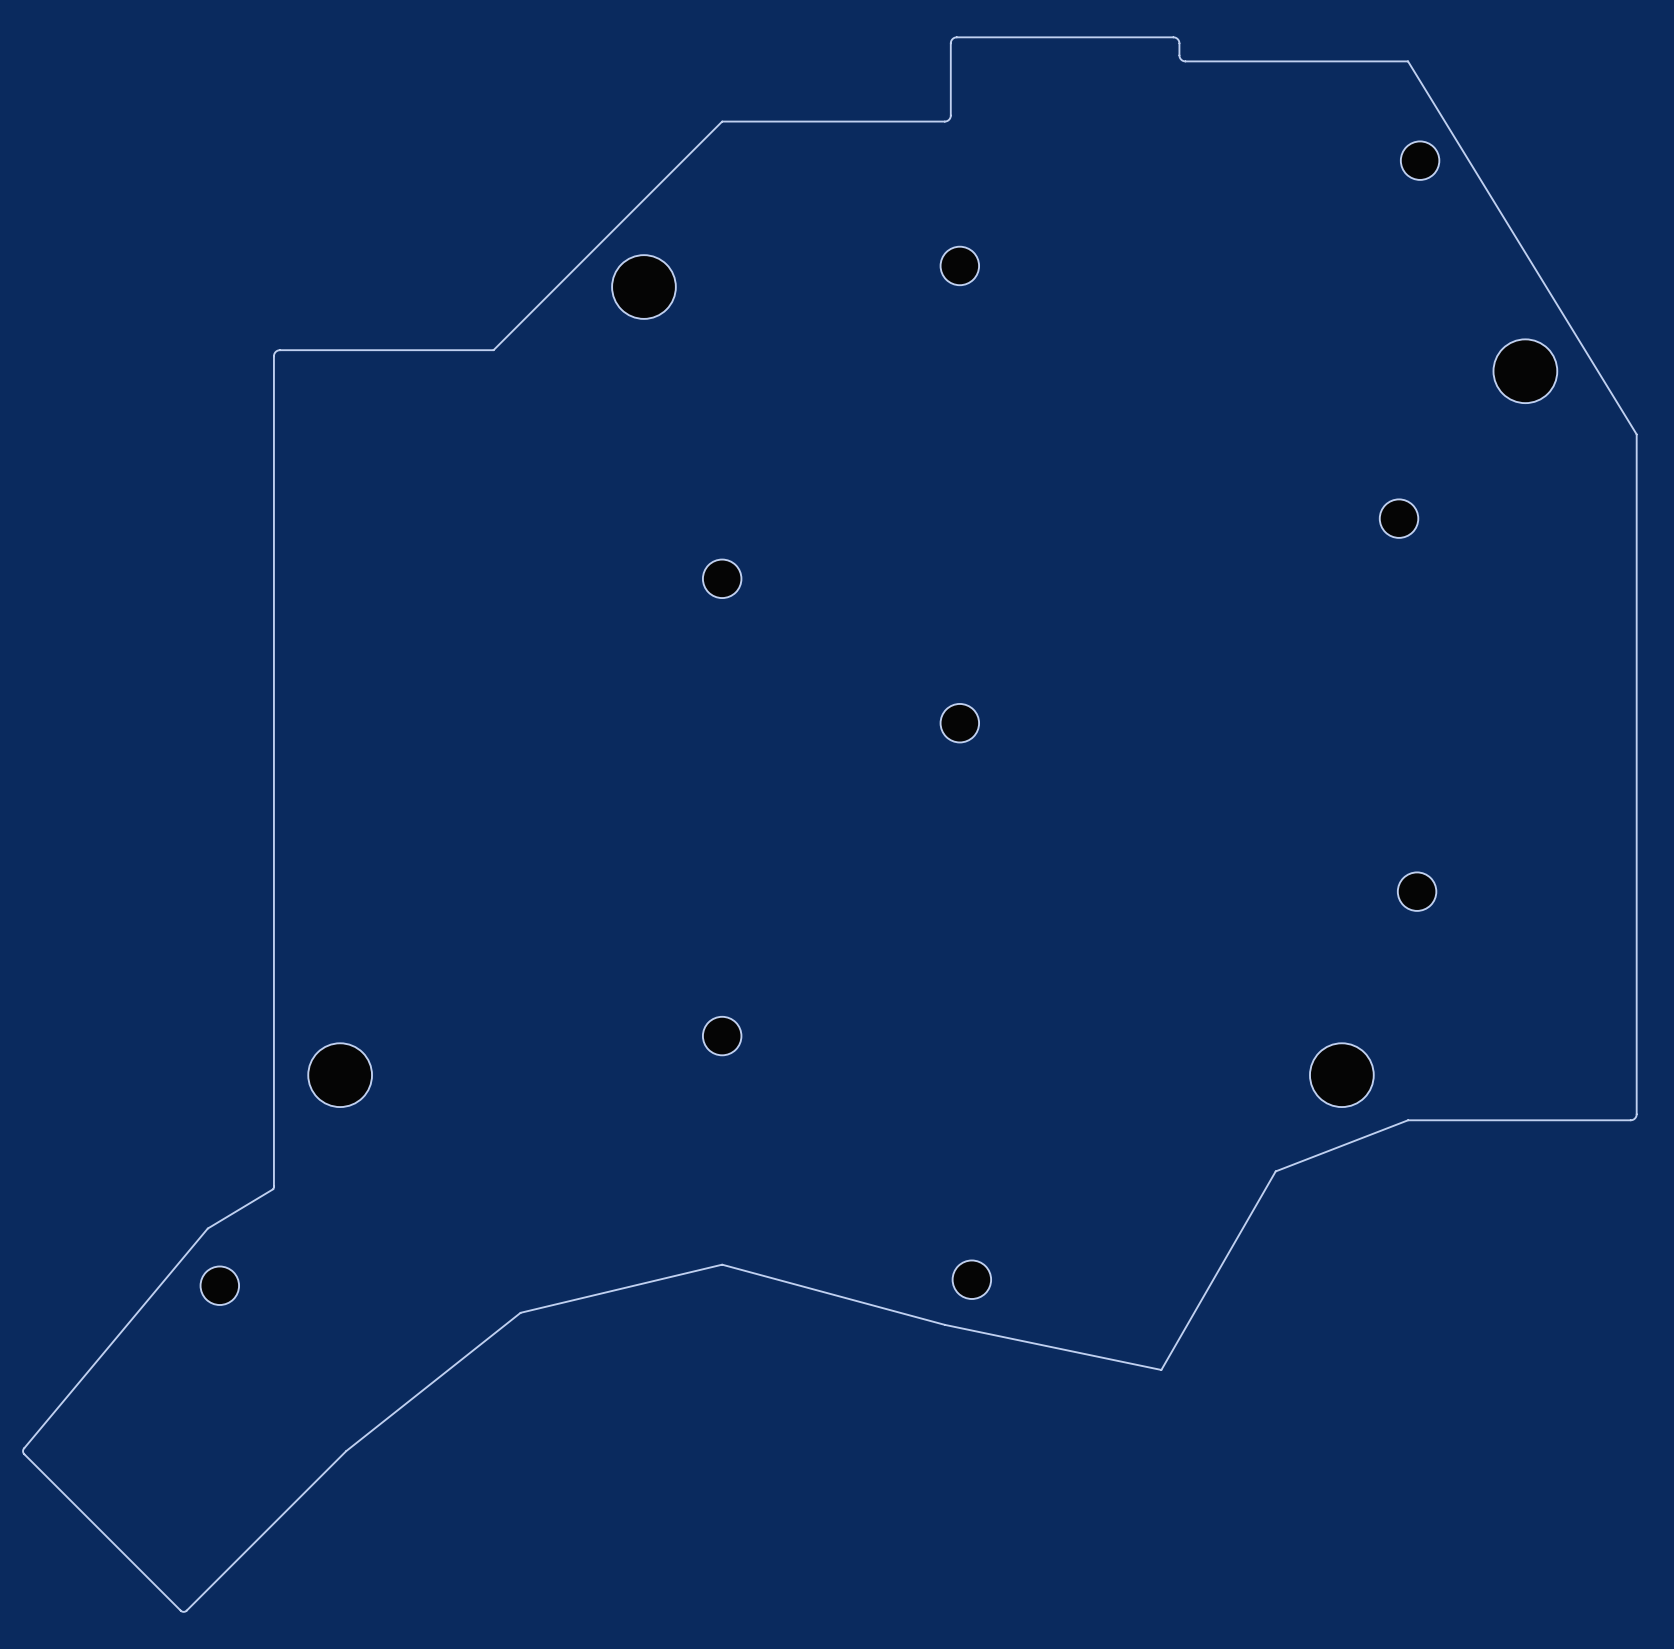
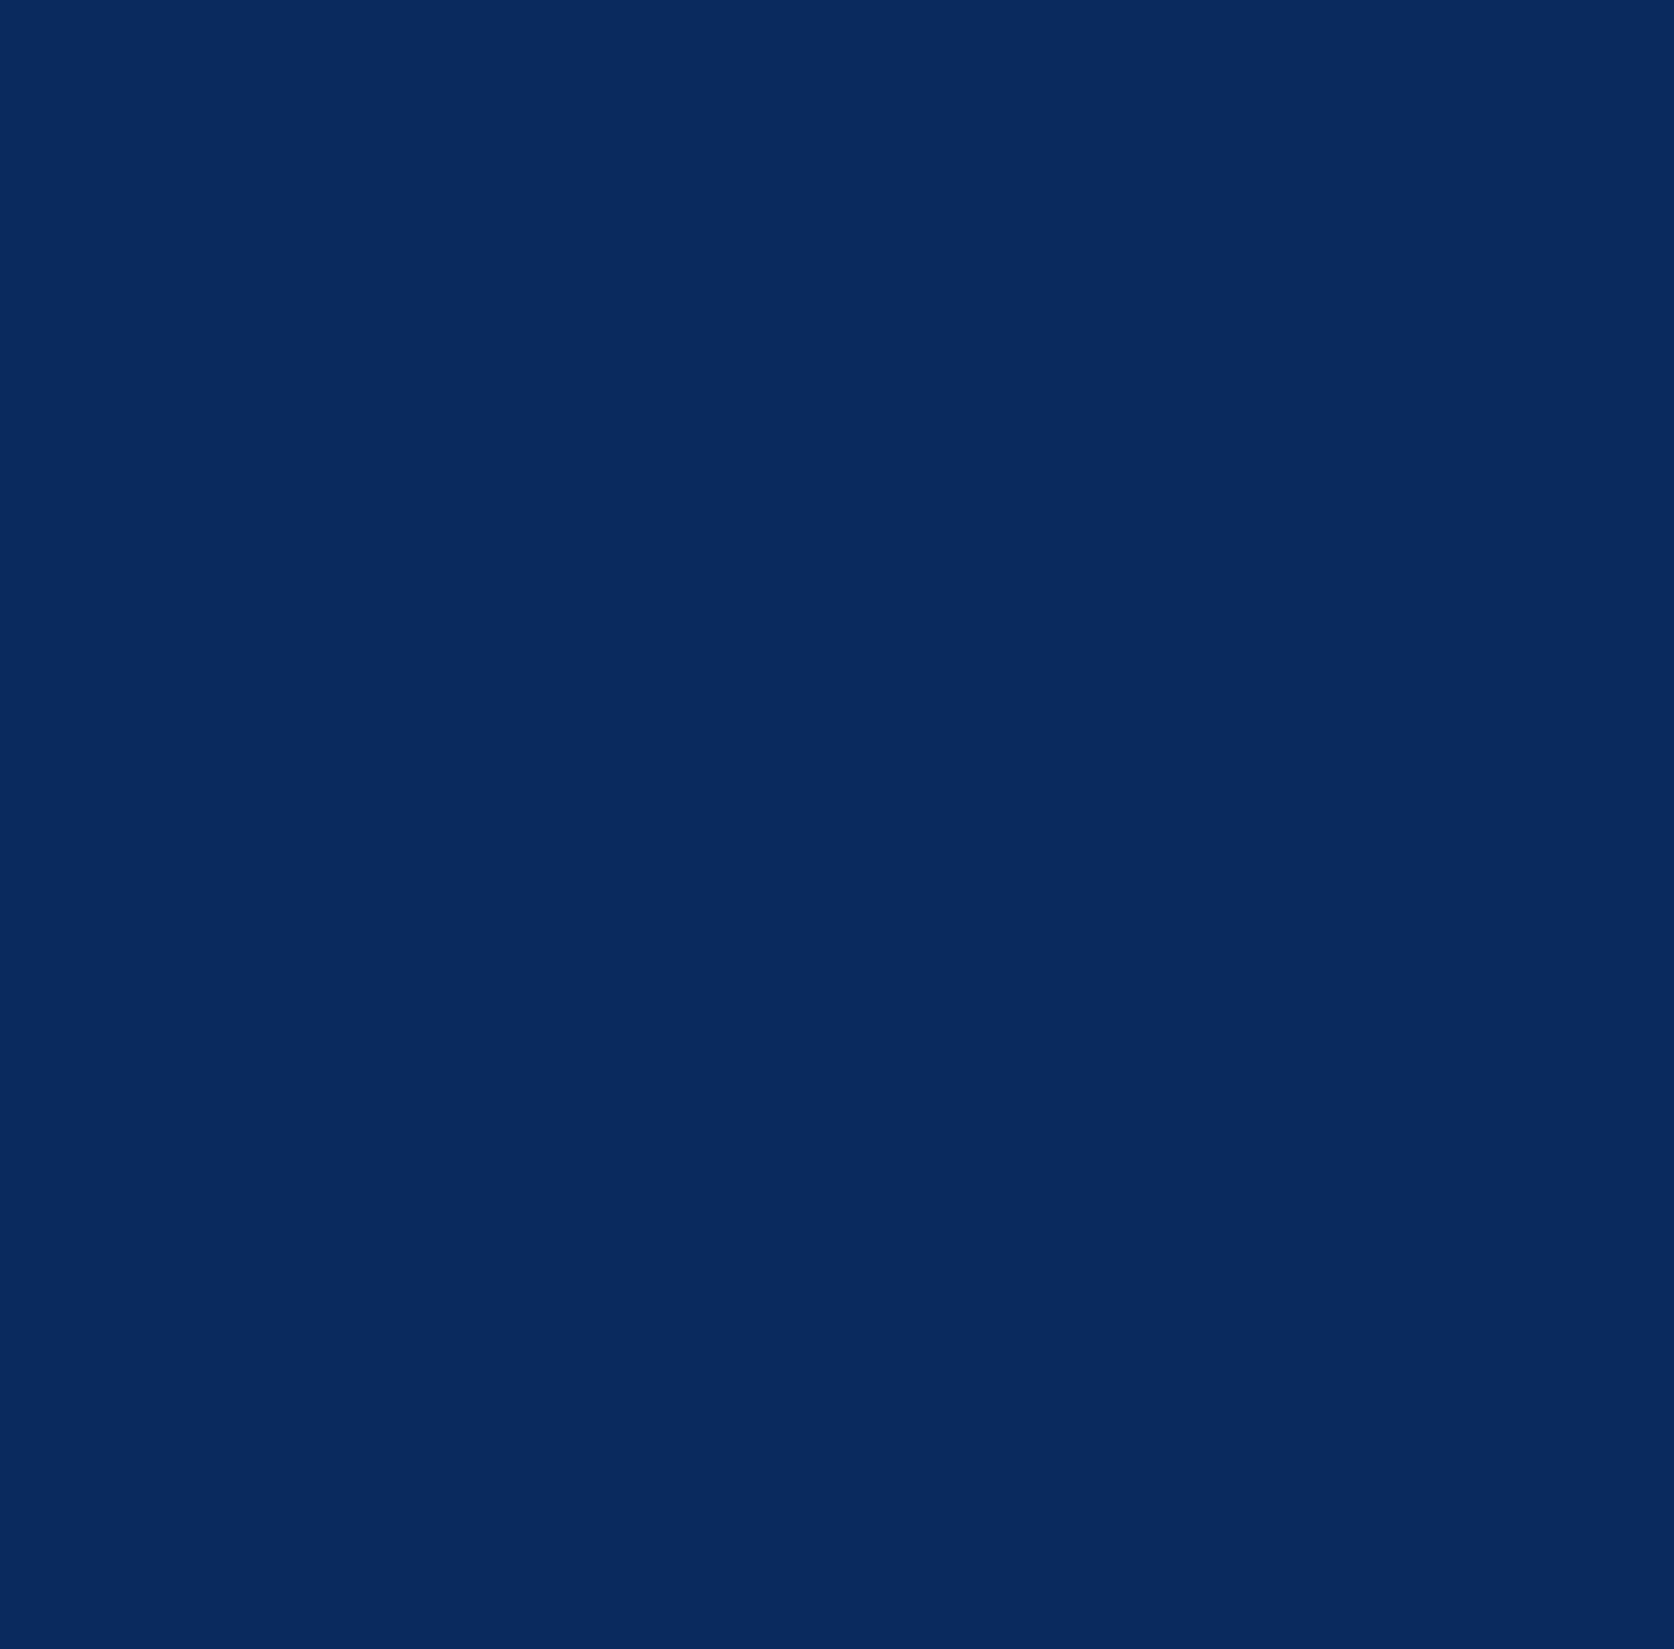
board edge: (1173, 37) (954, 37) (950, 42) (950, 115) (948, 120) (722, 121) (493, 350) (279, 350) (274, 353) (273, 1187) (207, 1228) (23, 1450) (24, 1454) (181, 1611) (186, 1610) (346, 1451) (520, 1312) (722, 1264) (944, 1324) (1161, 1369) (1275, 1171) (1408, 1120) (1630, 1120) (1635, 1117) (1636, 434) (1408, 61) (1184, 61) (1179, 56) (1178, 41) (1173, 37) -> none
part: (1420, 160) -> none
part: (959, 265) -> none
part: (643, 287) -> none
part: (1525, 371) -> none
part: (1399, 518) -> none
part: (722, 578) -> none
part: (959, 723) -> none
part: (1417, 891) -> none
part: (722, 1036) -> none
part: (340, 1075) -> none
part: (1341, 1075) -> none
part: (971, 1279) -> none
part: (219, 1285) -> none

